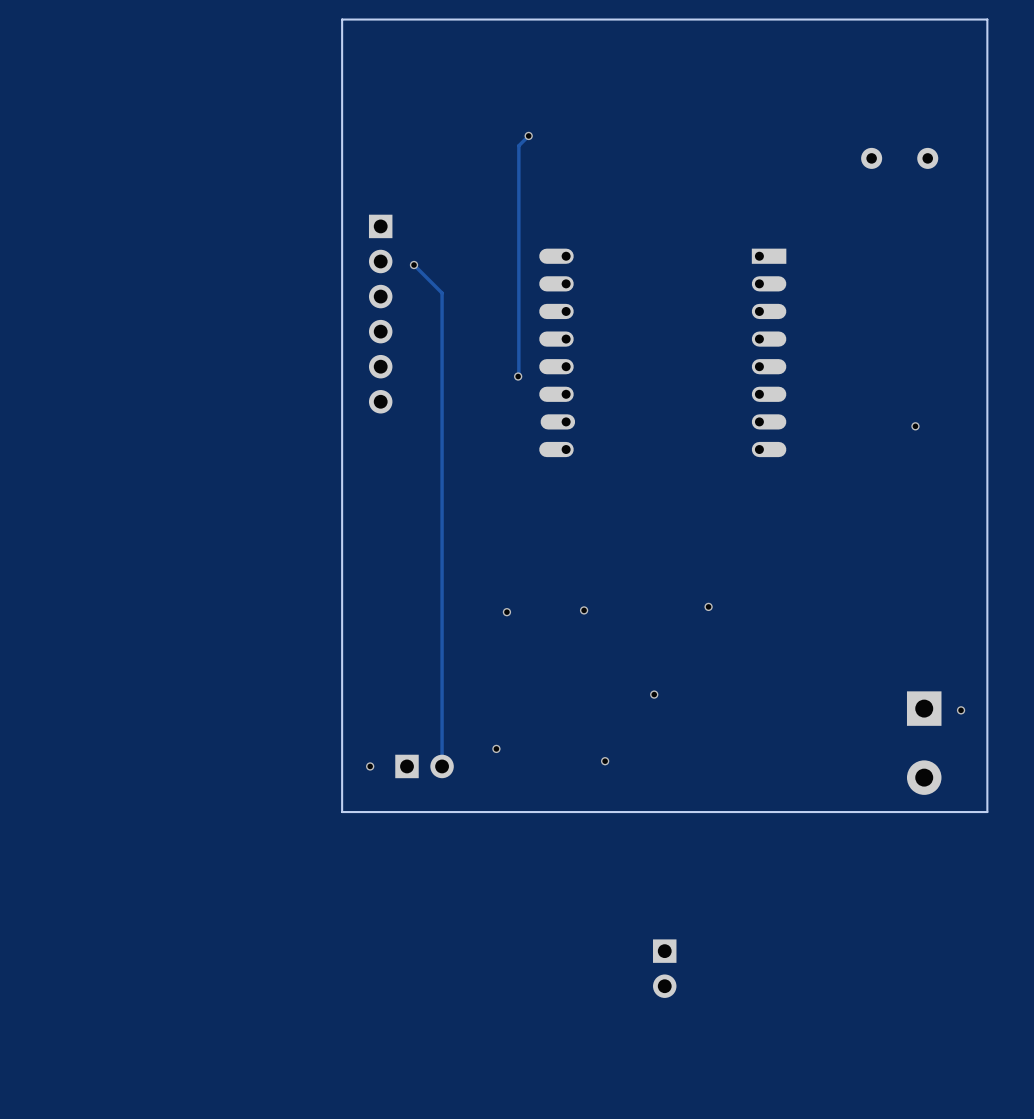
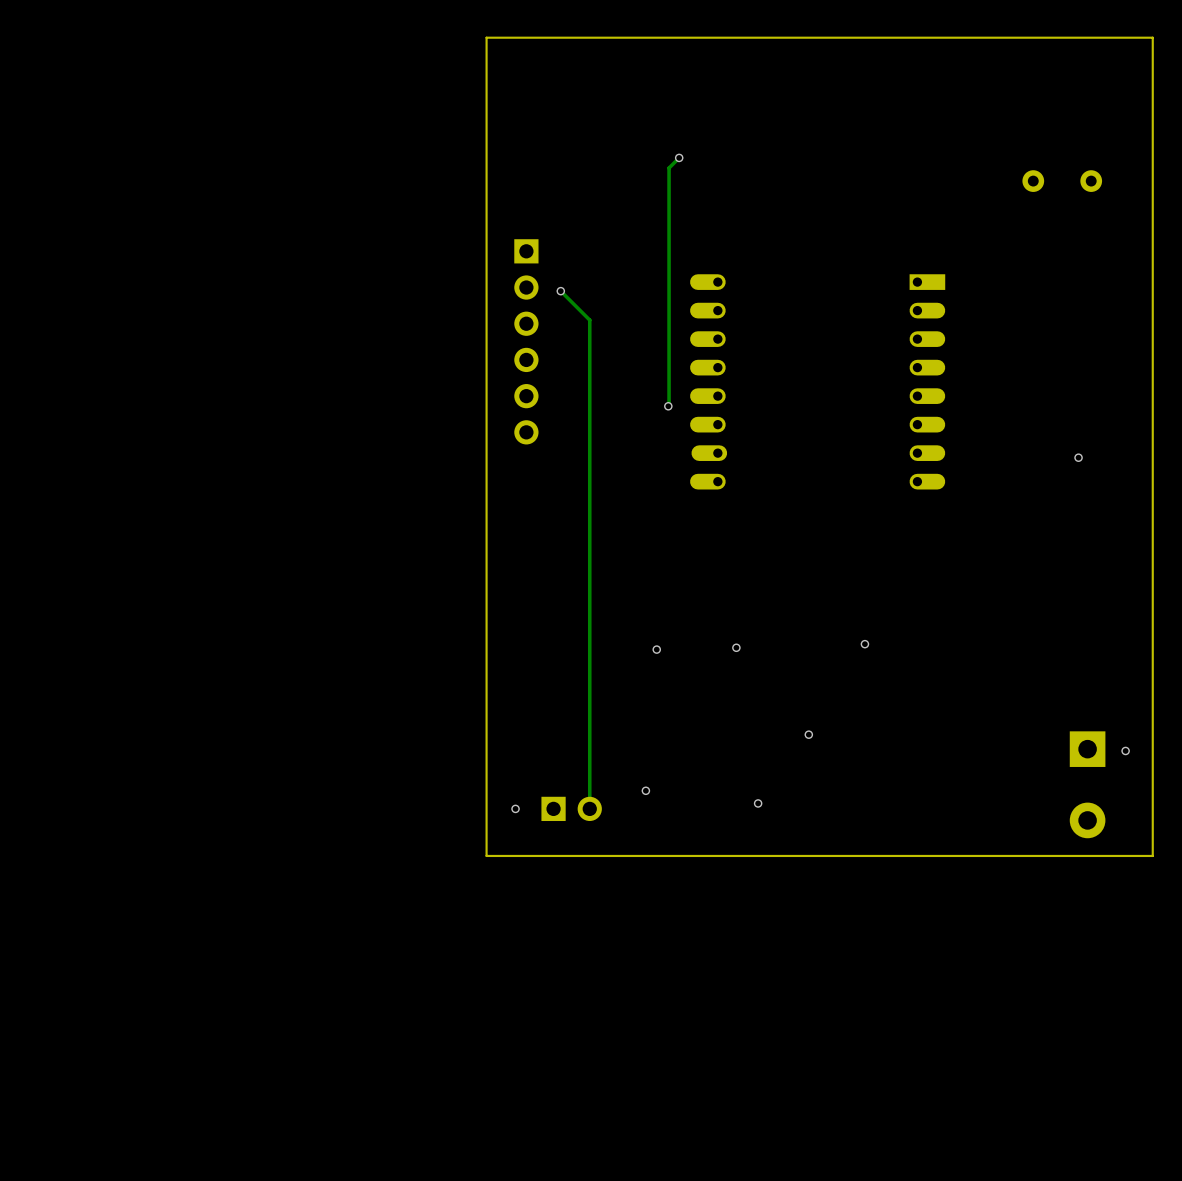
part: (664, 968) -> none

